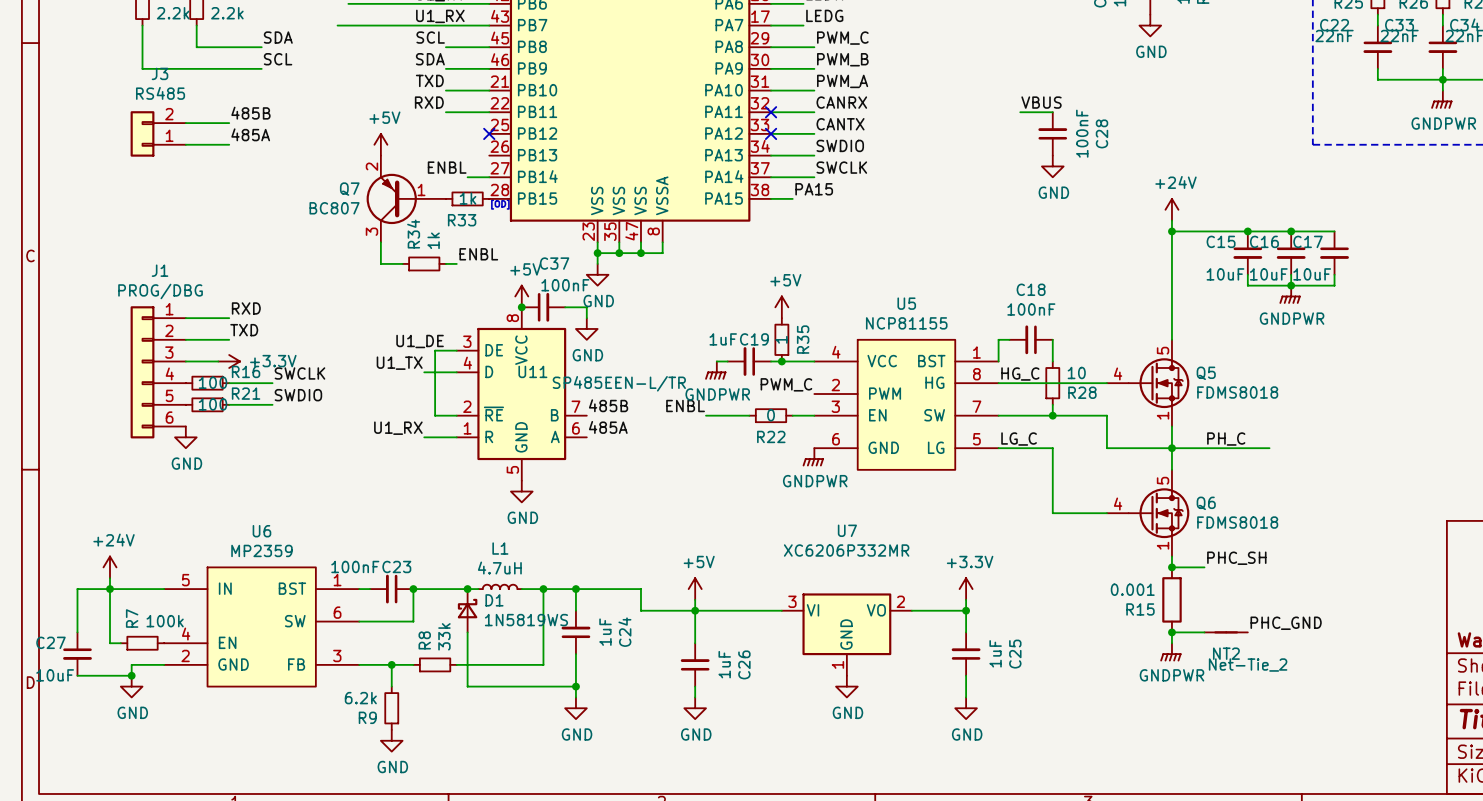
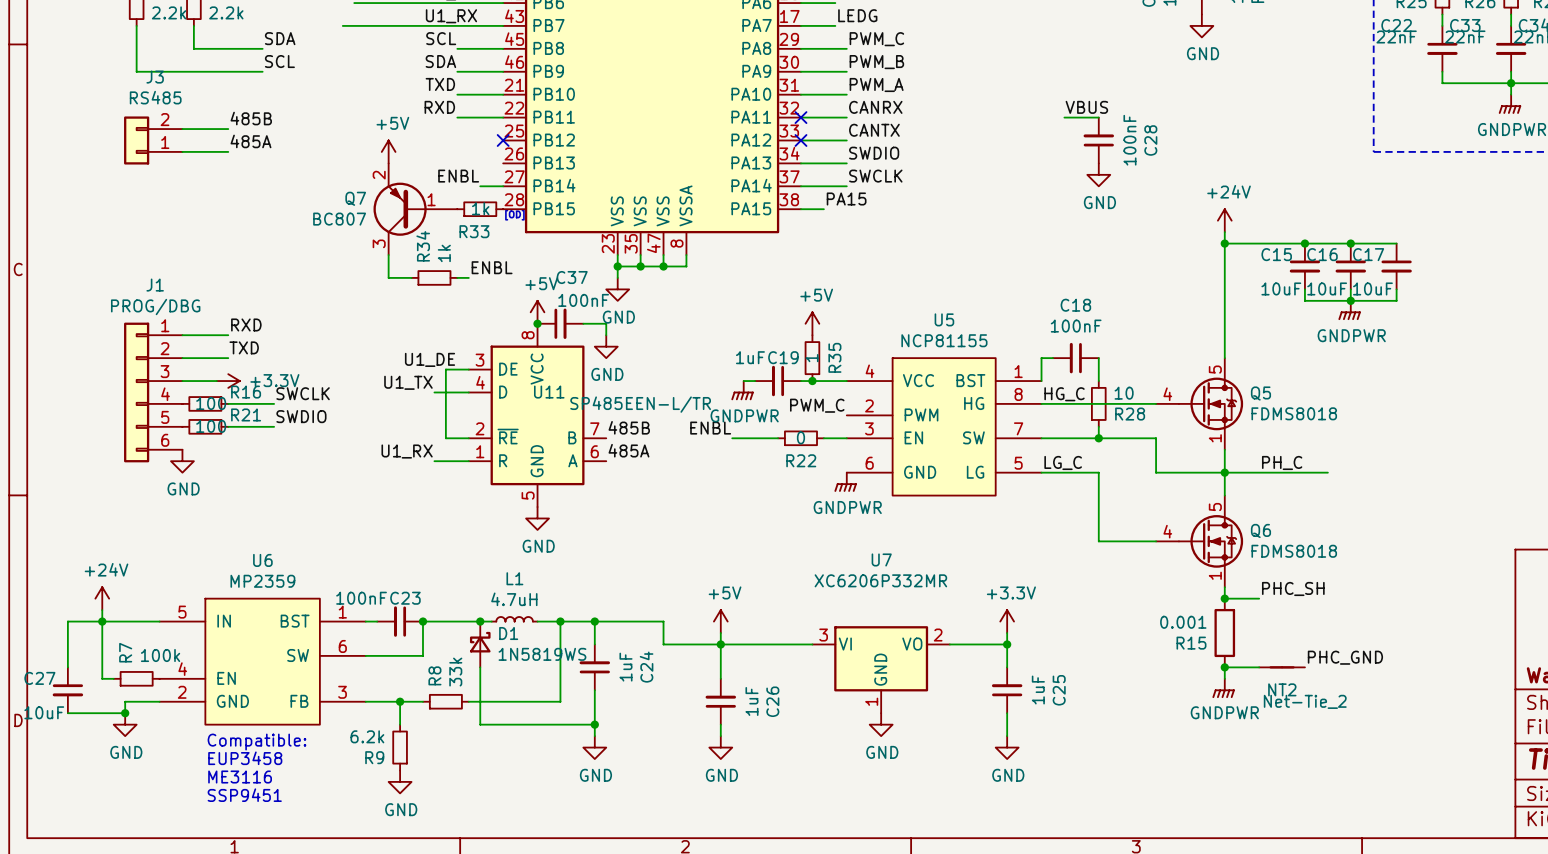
text: none -> Compatible: (256, 742)
text: none -> EUP3458 (245, 758)
text: none -> ME3116 (240, 777)
text: none -> SSP9451 (244, 795)

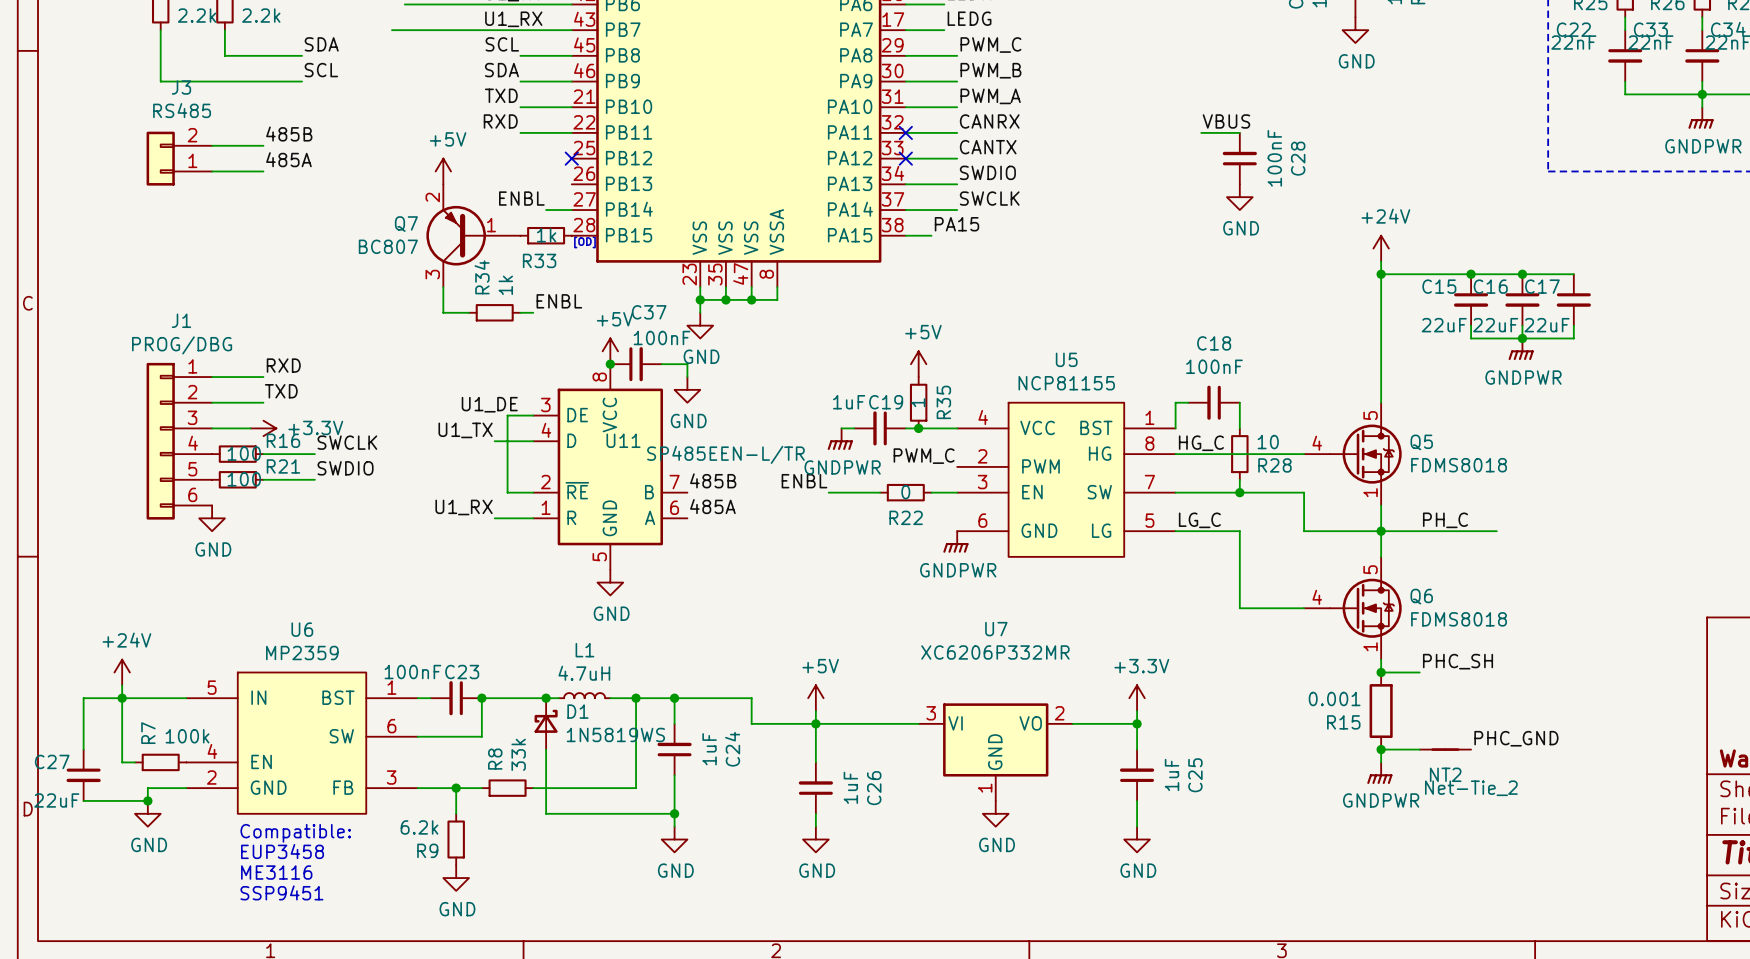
C15 value: 10uF (1281, 288) -> 22uF (1444, 325)
C16 value: 10uF (1327, 288) -> 22uF (1495, 325)
C17 value: 10uF (1372, 288) -> 22uF (1547, 325)
C27 value: 10uF (44, 712) -> 22uF (56, 800)

